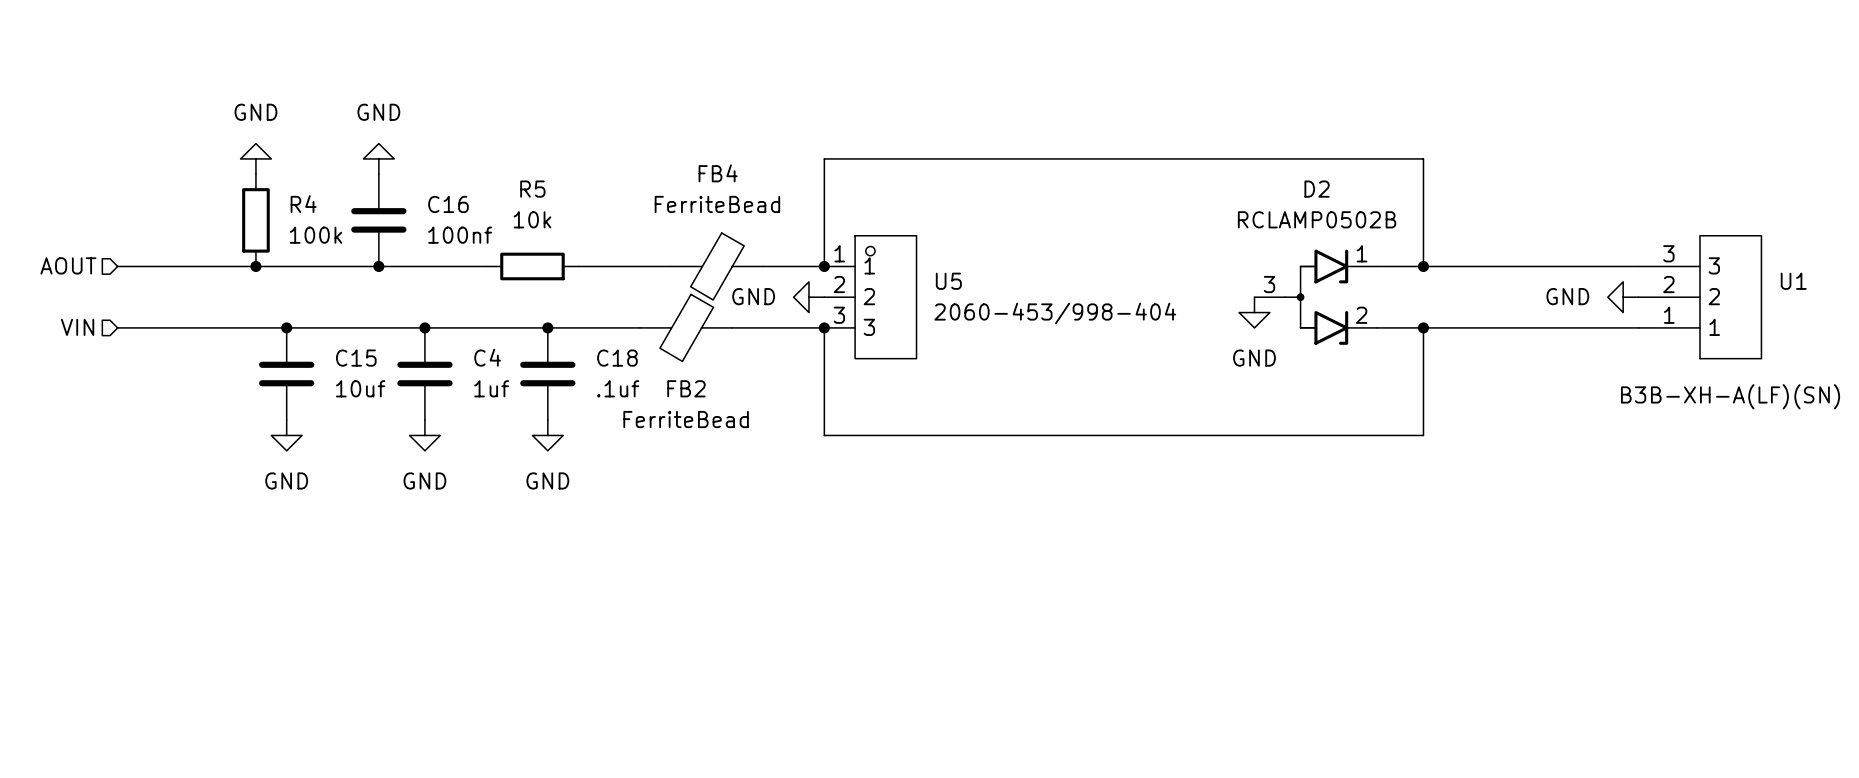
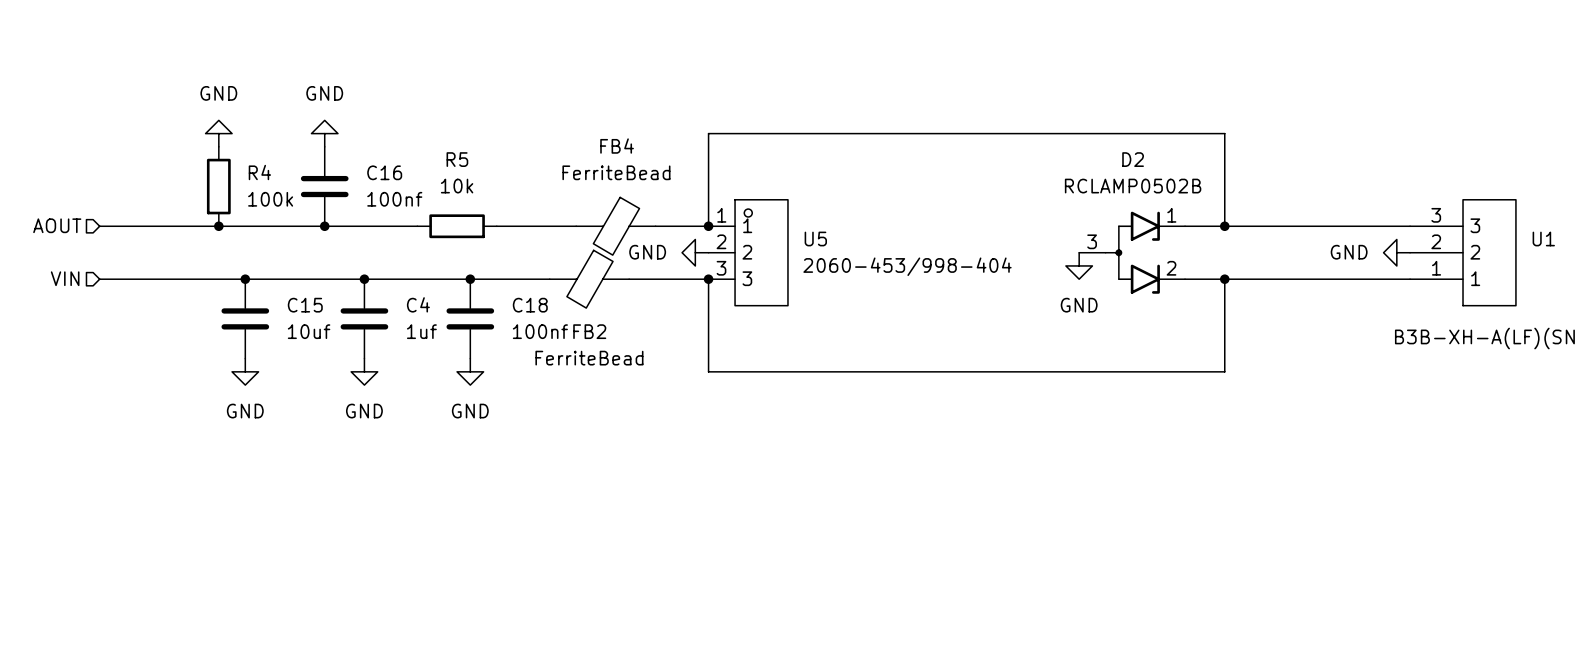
C18 value: .1uf (618, 388) -> 100nf (540, 331)

